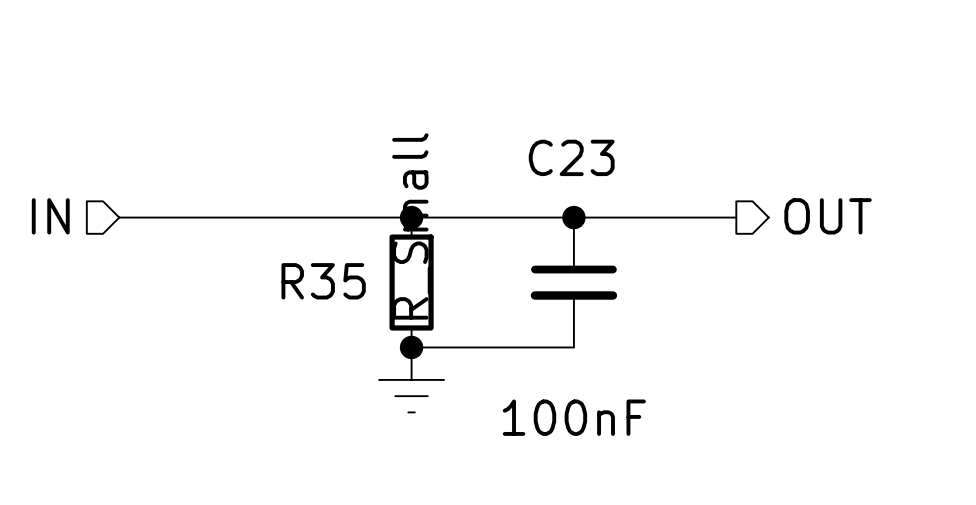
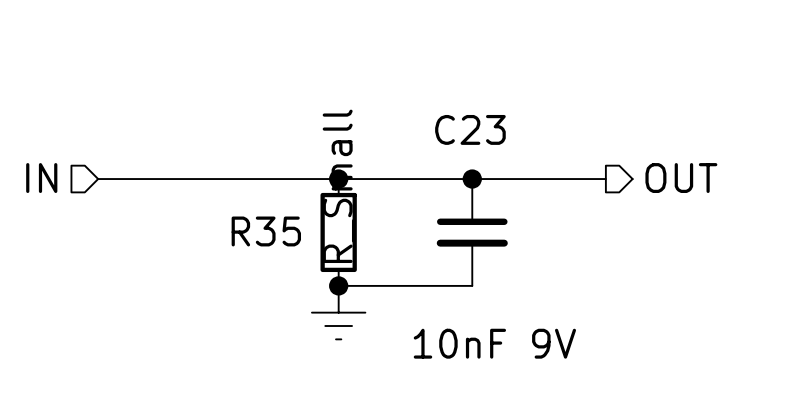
C23 value: 100nF (574, 417) -> 10nF 9V (494, 343)

